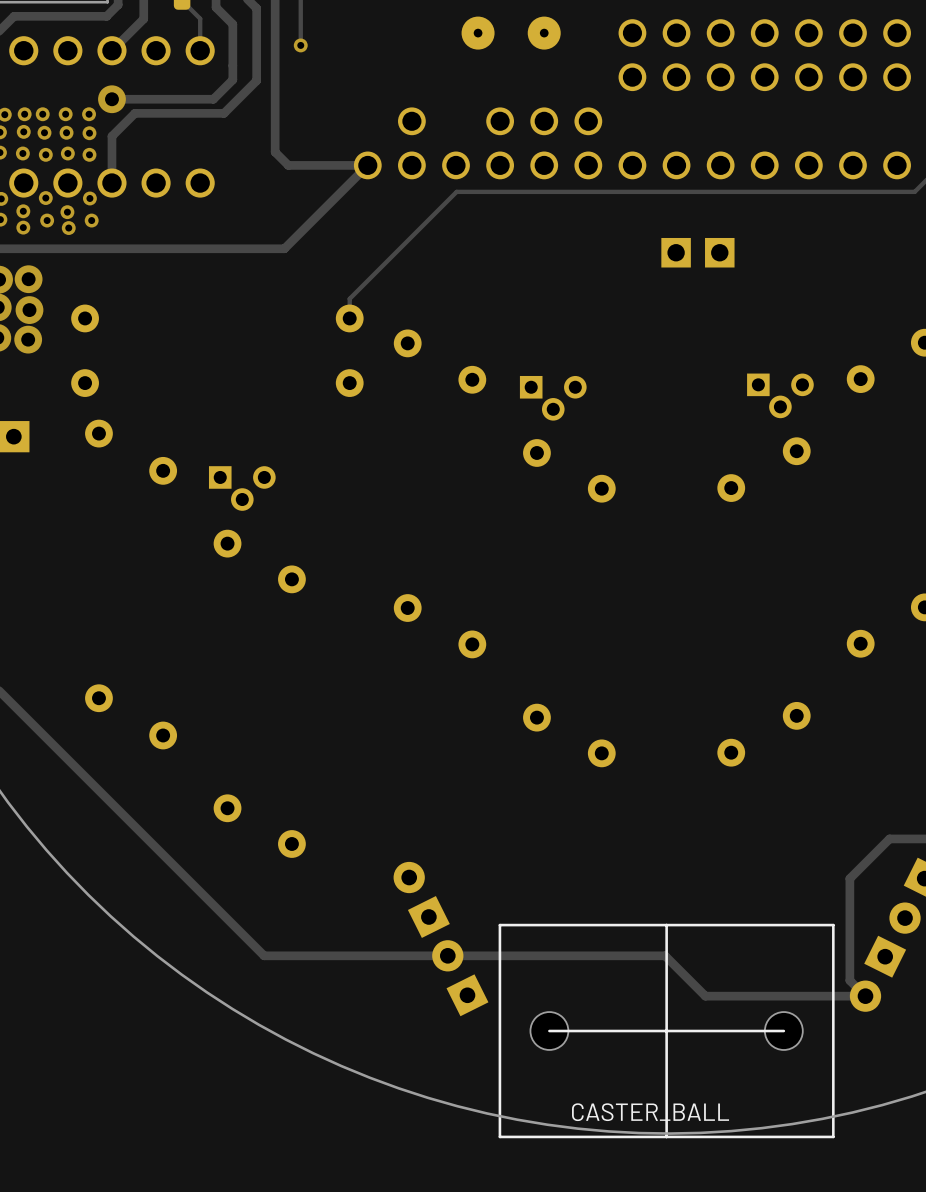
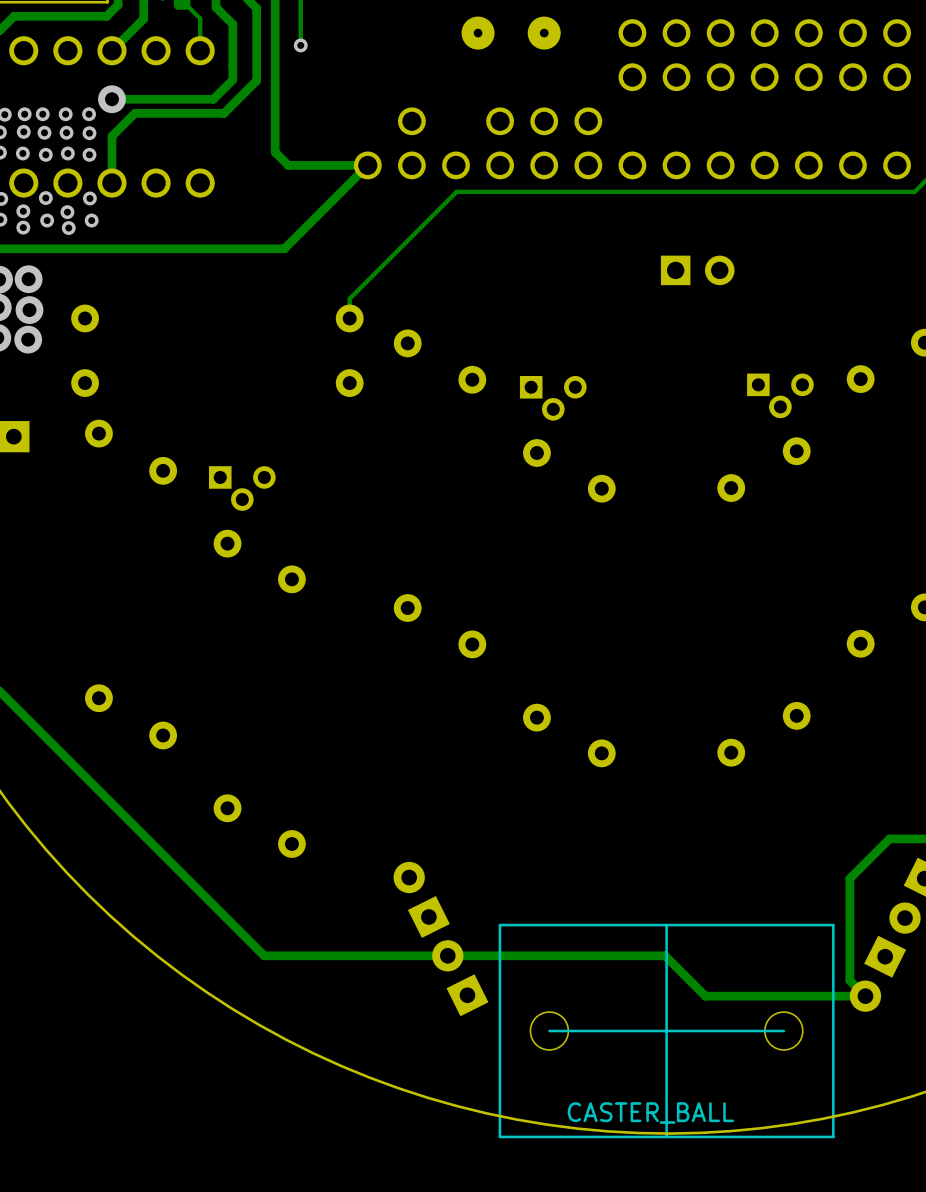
part: (676, 252) -> none
part: (719, 252) -> none
part: none -> (697, 270)

